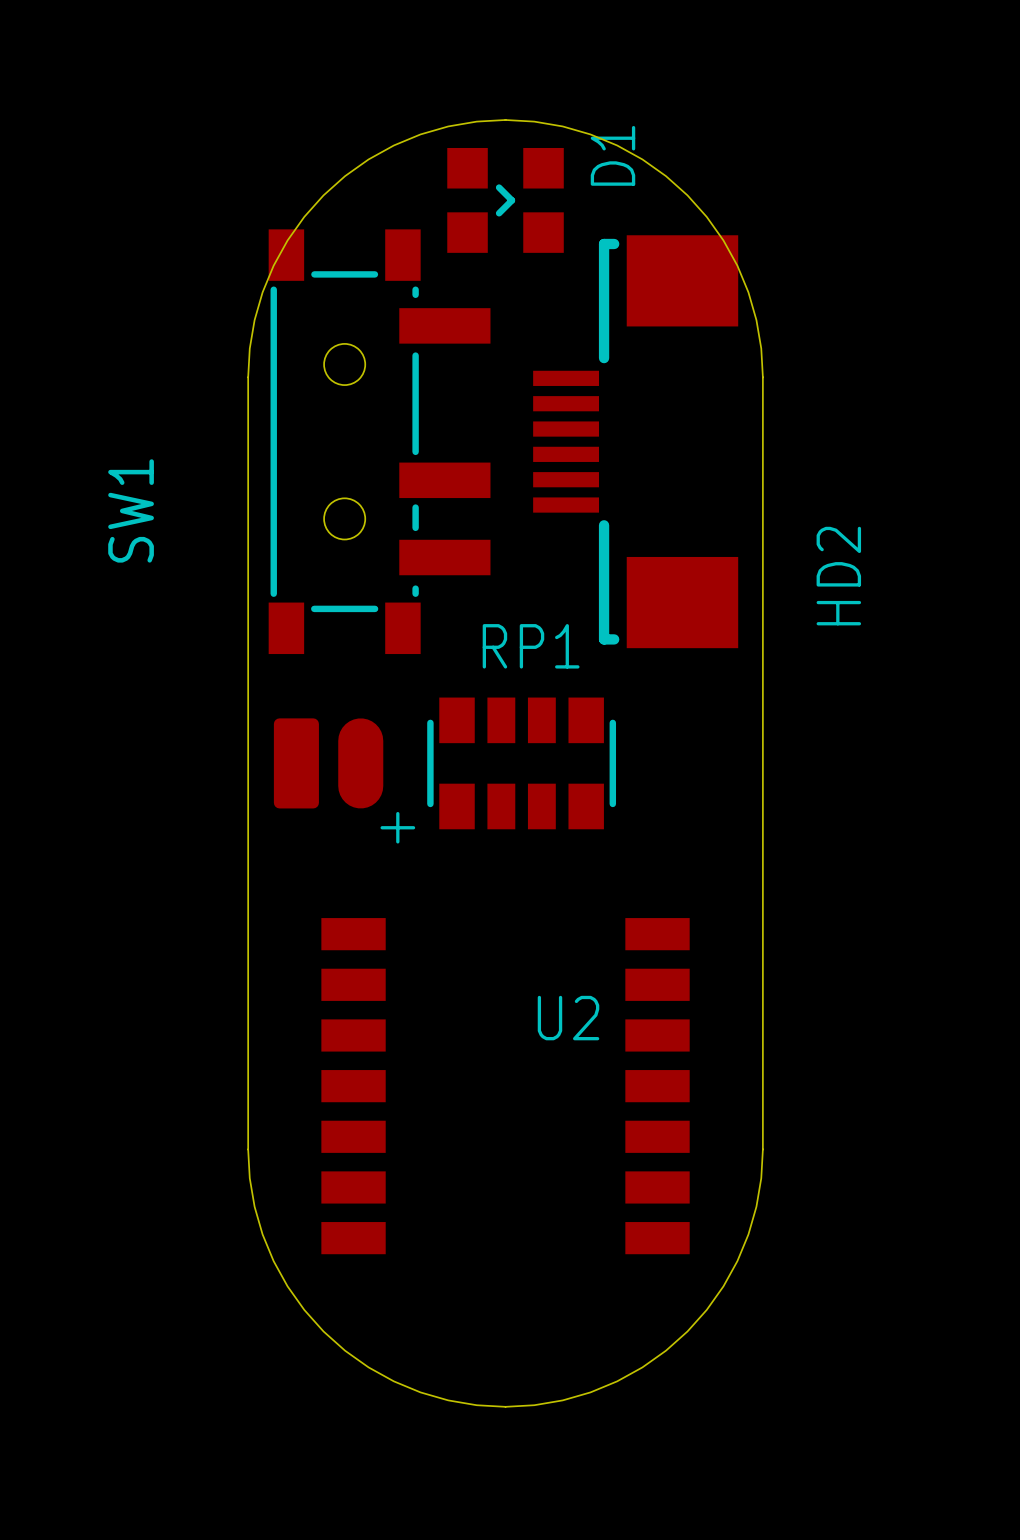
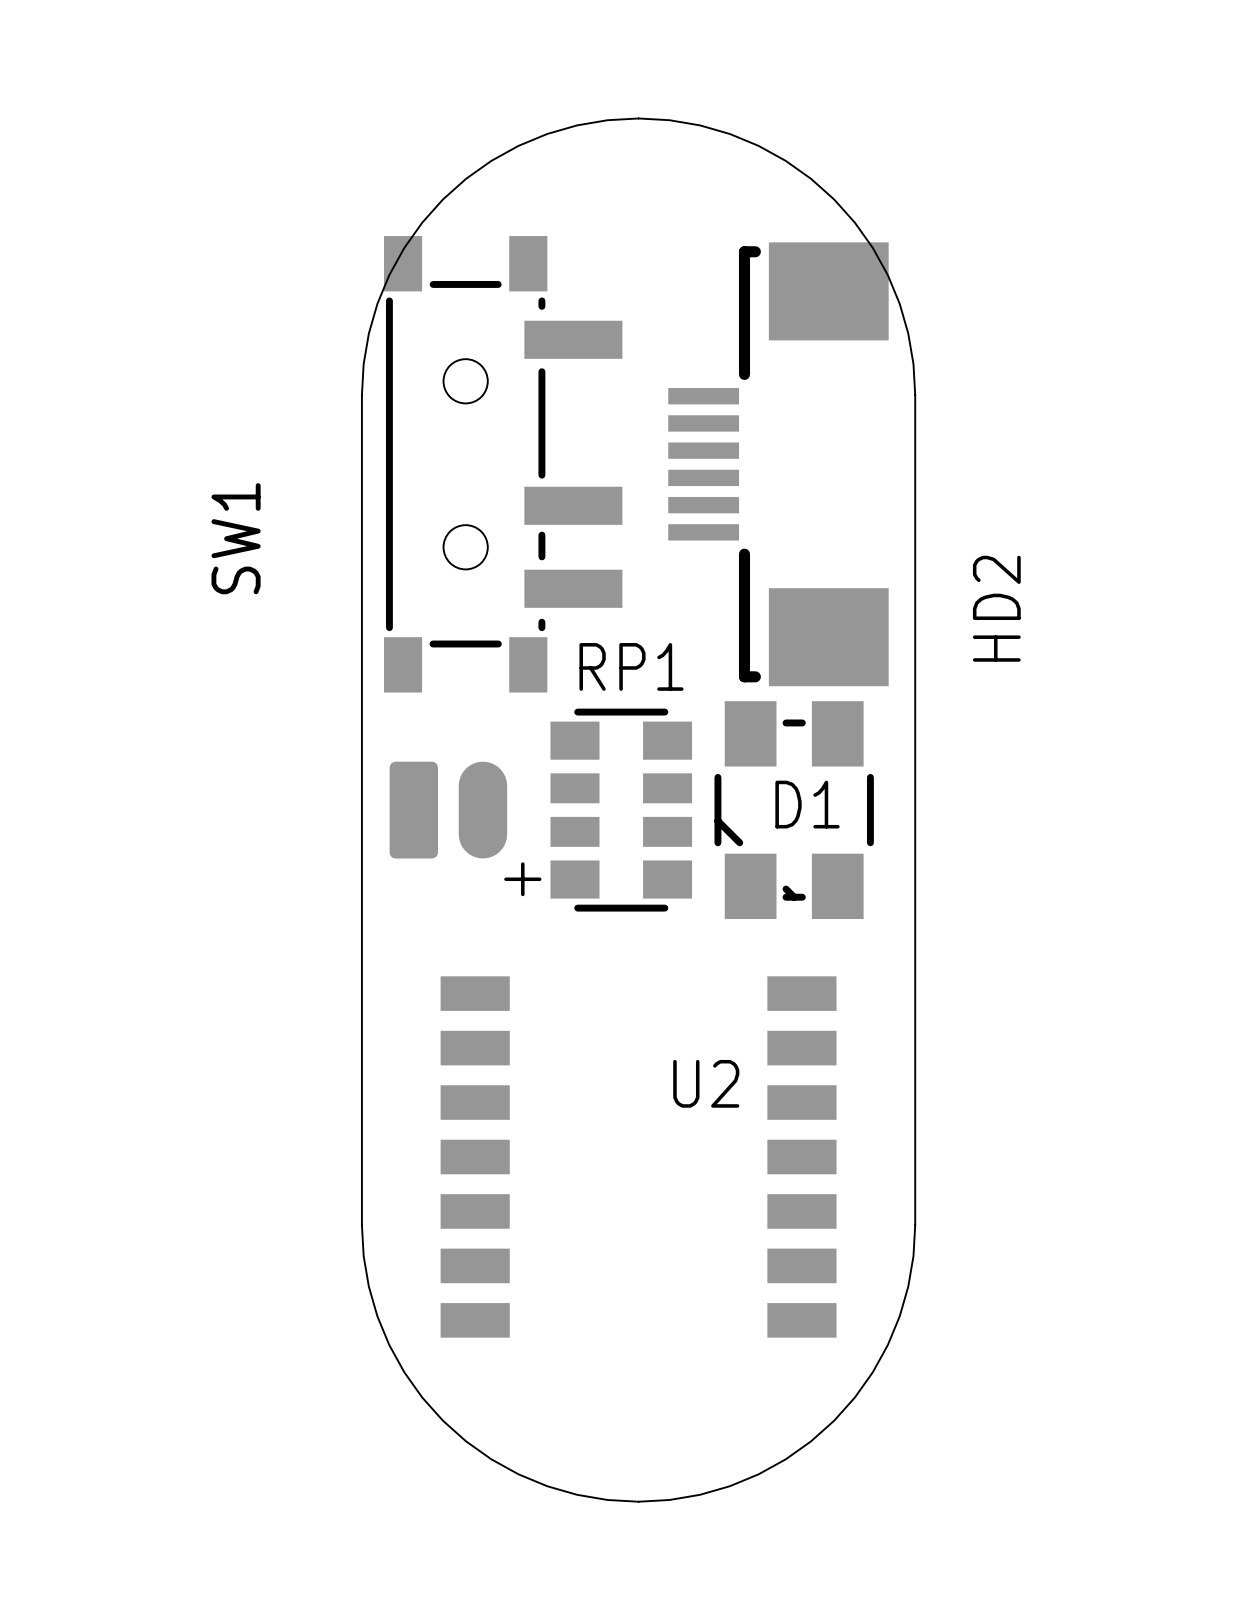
D1 footprint: [447, 147, 564, 253] -> [714, 701, 874, 920]
D1 name position: D1 (612, 155) -> D1 (807, 804)
RP1 rotation: 0° (521, 763) -> 90° clockwise (621, 810)

